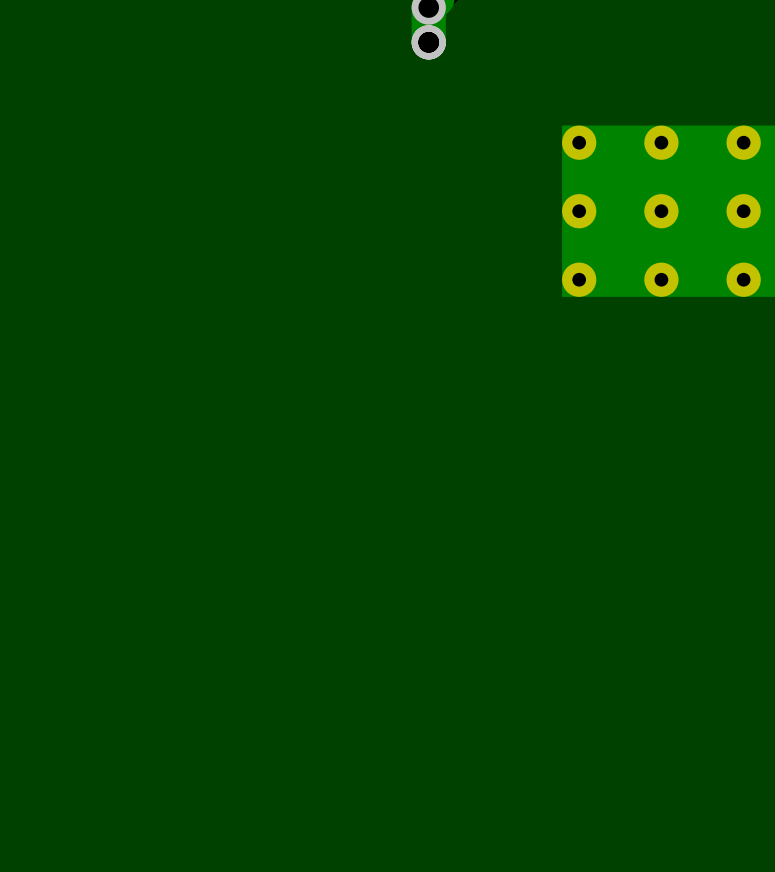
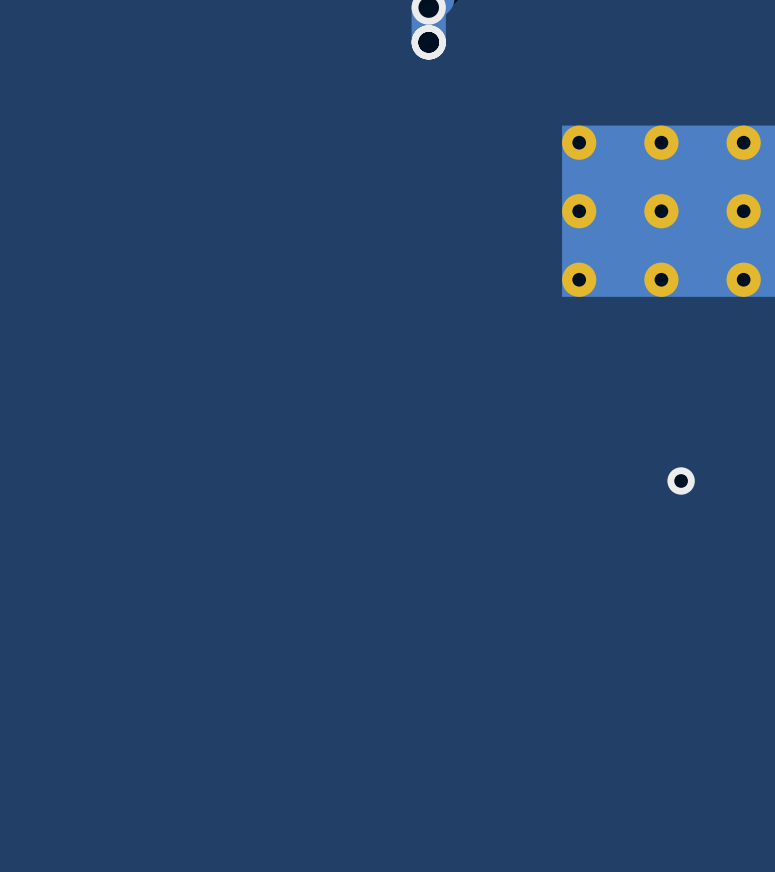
via: none -> (681, 480)

